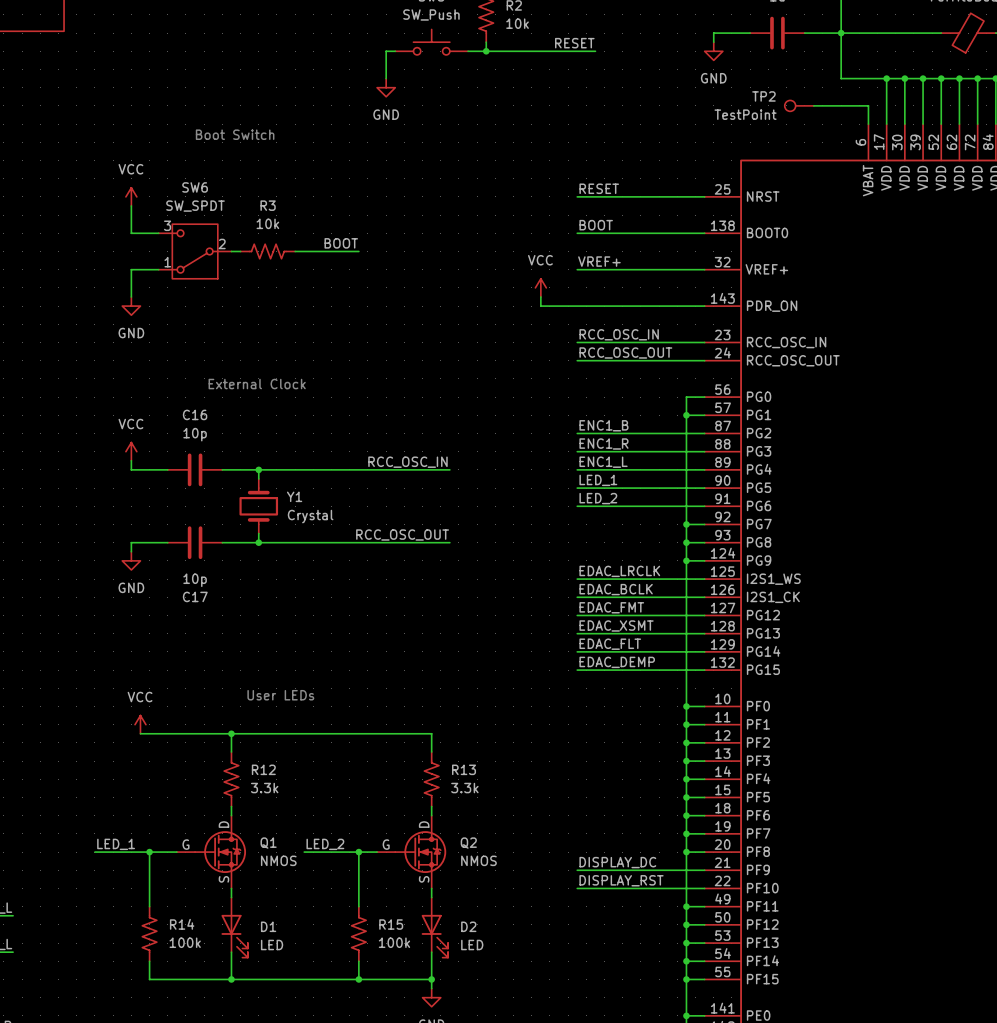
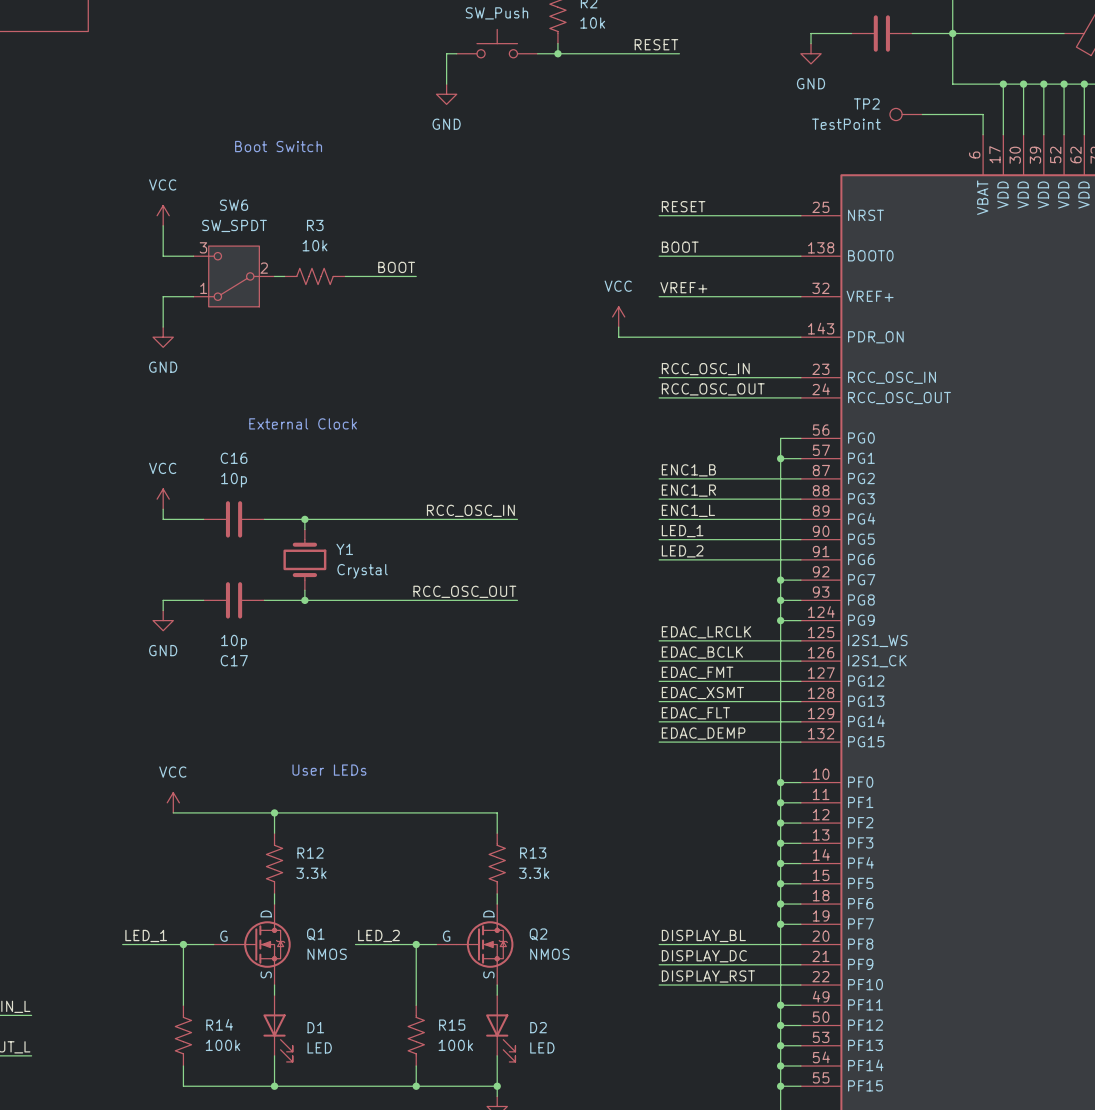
label: none -> DISPLAY_BL (703, 935)
wire: none -> (659, 944) (780, 944)
junction: (686, 852) -> none

